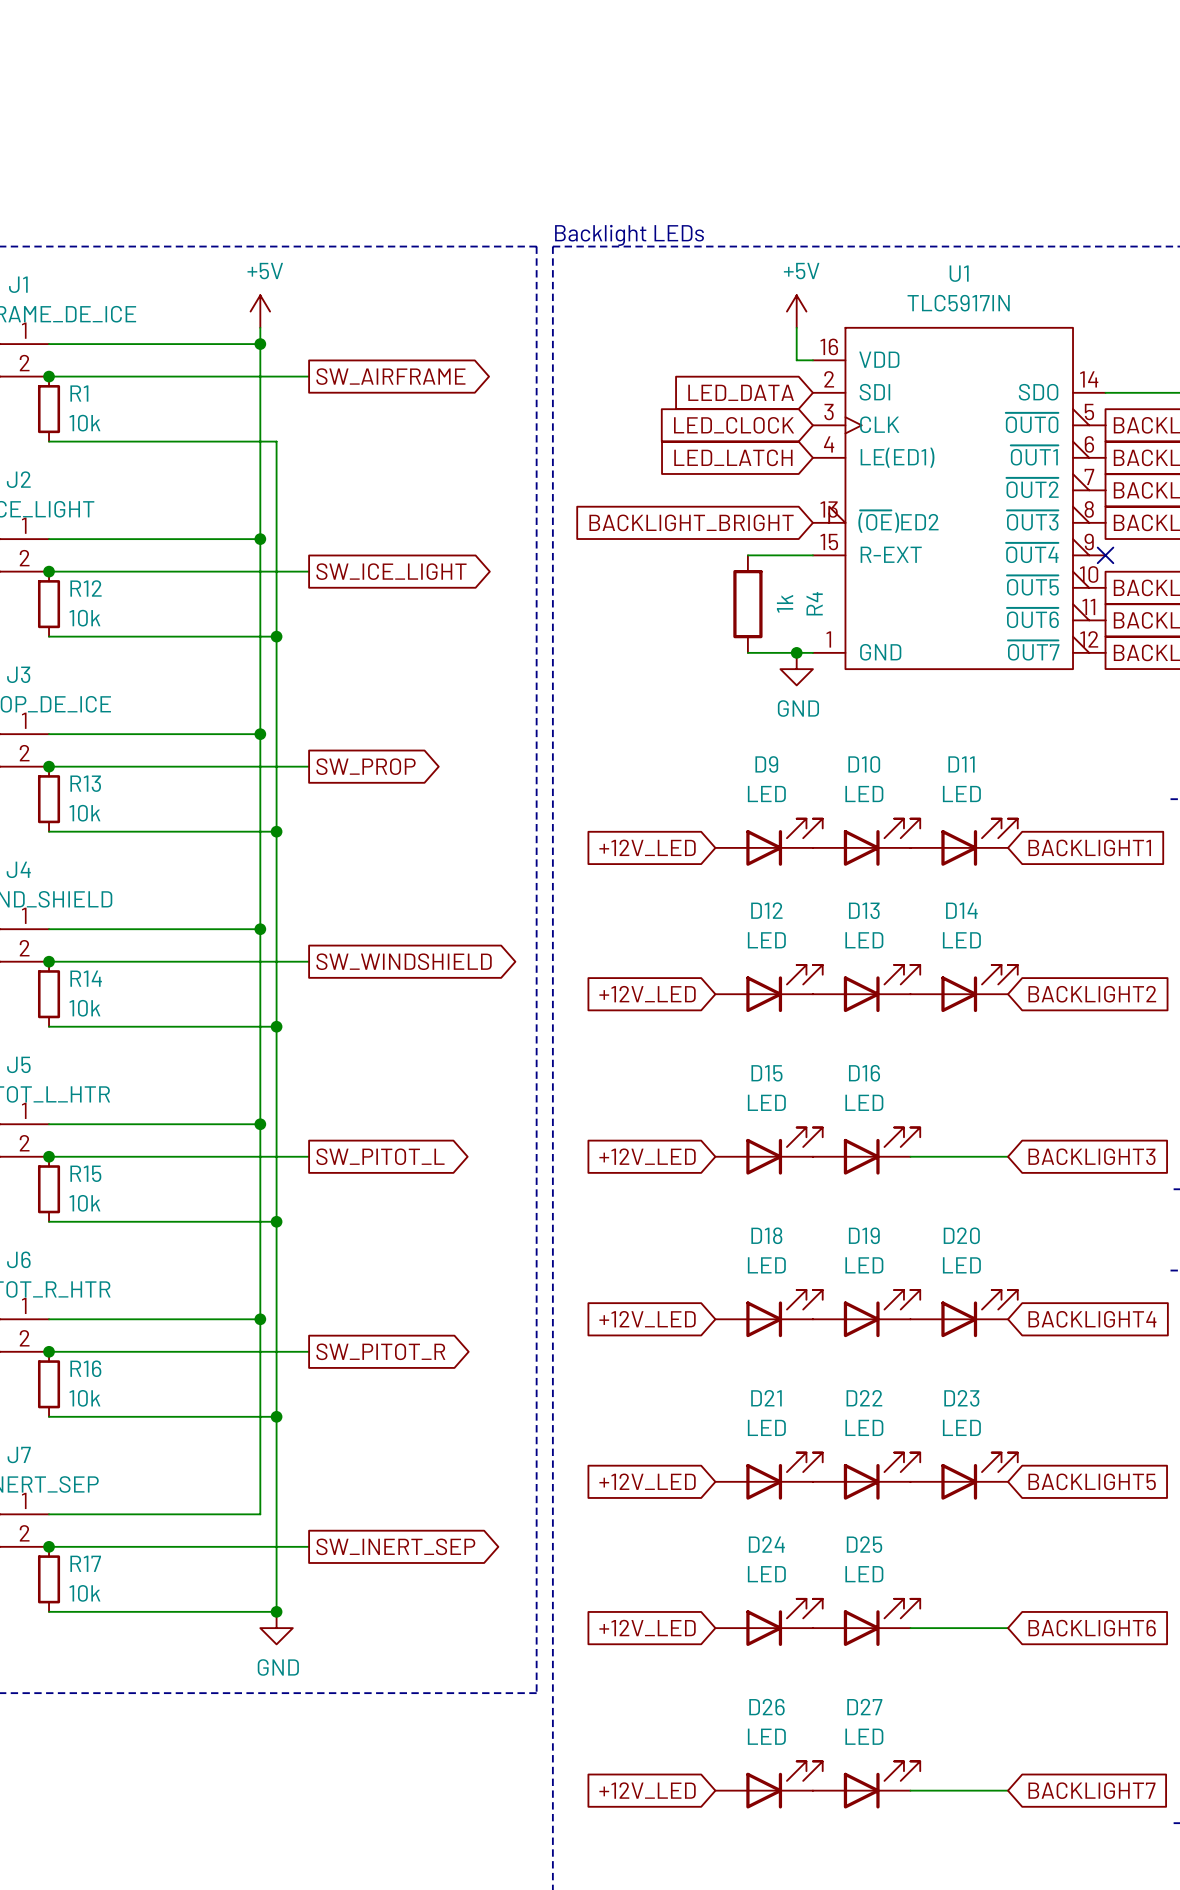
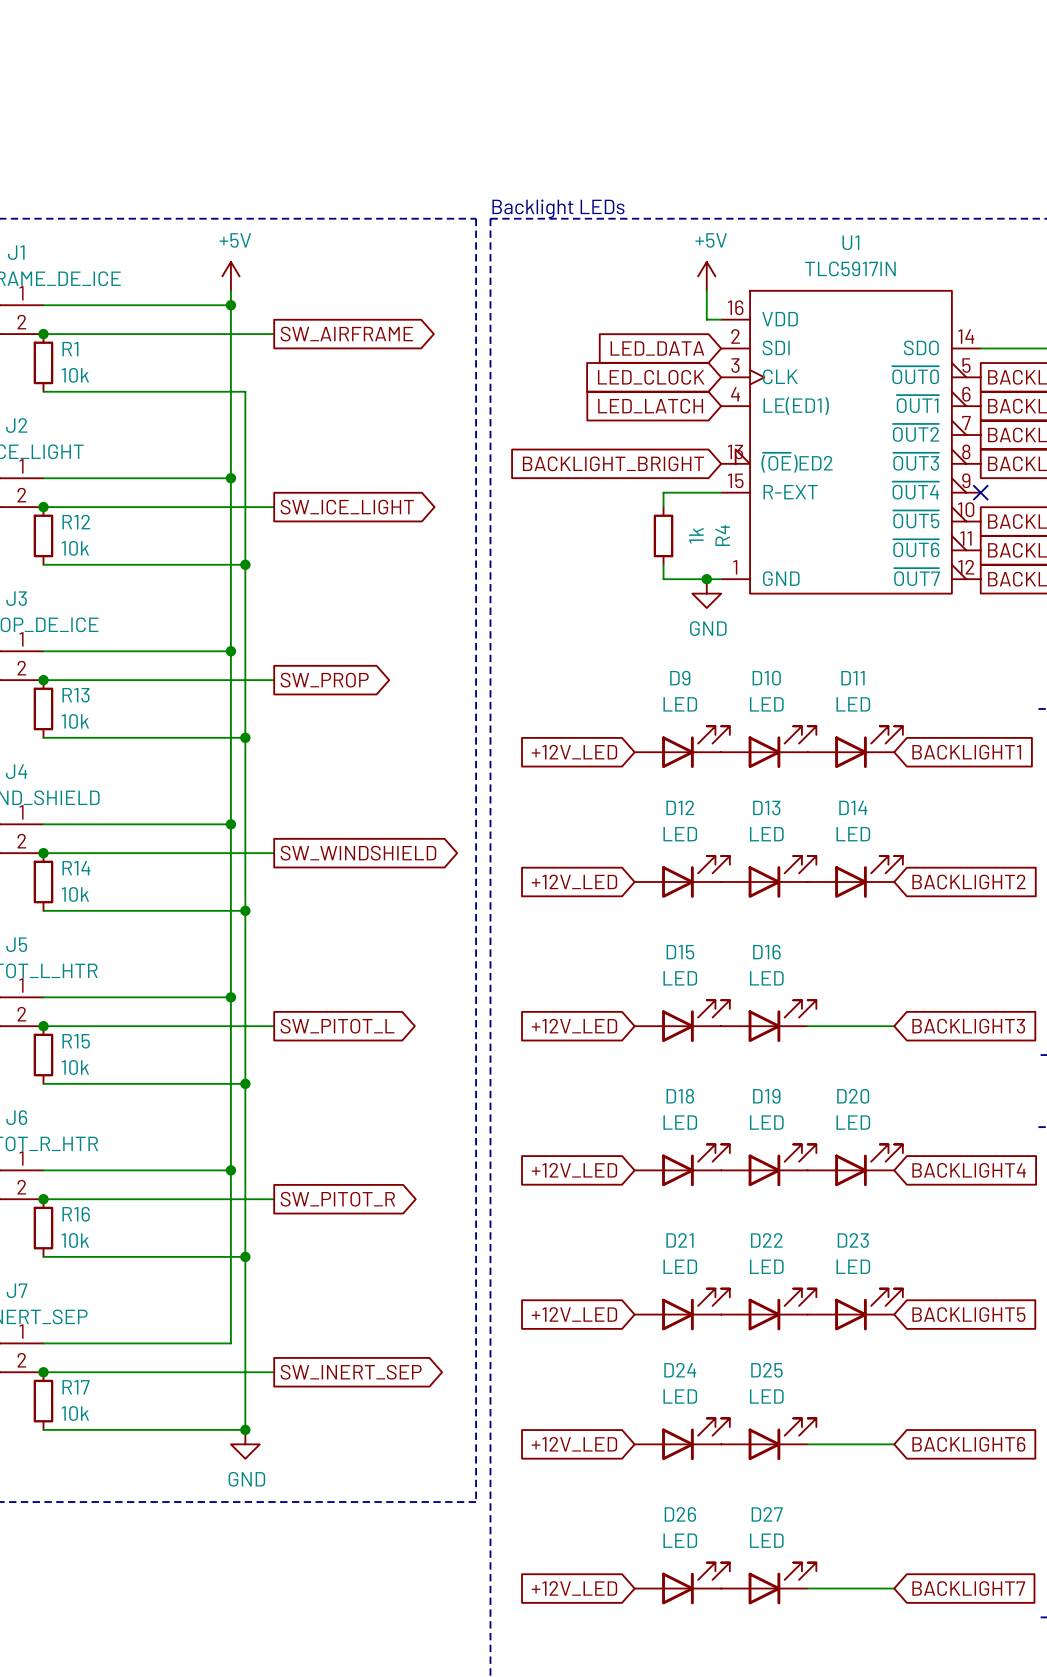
R4 symbol: [733, 555, 763, 653] -> [653, 507, 674, 565]

